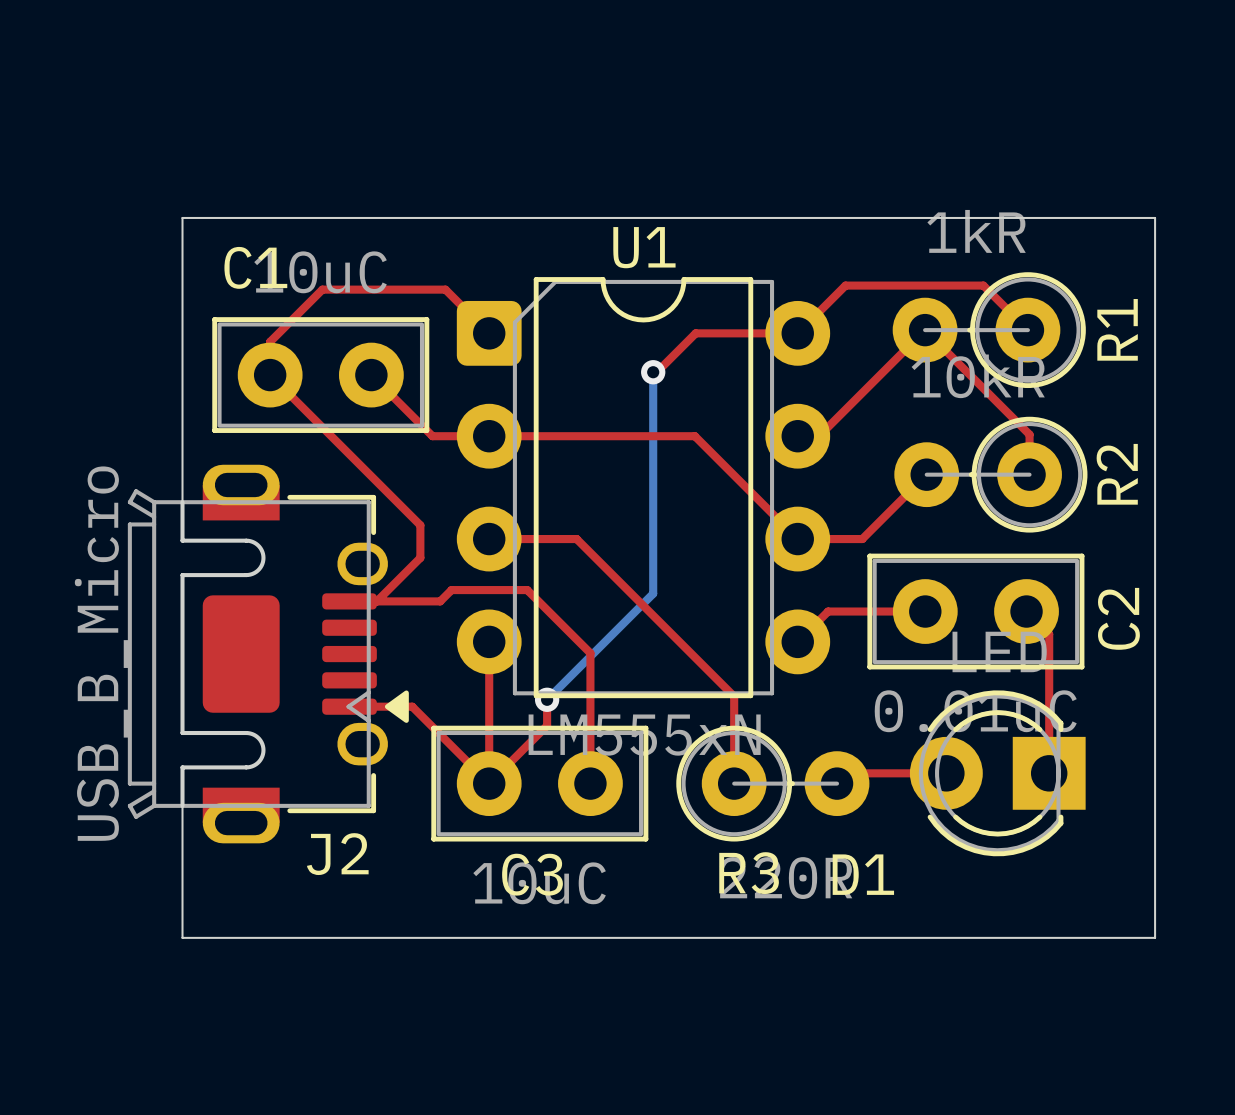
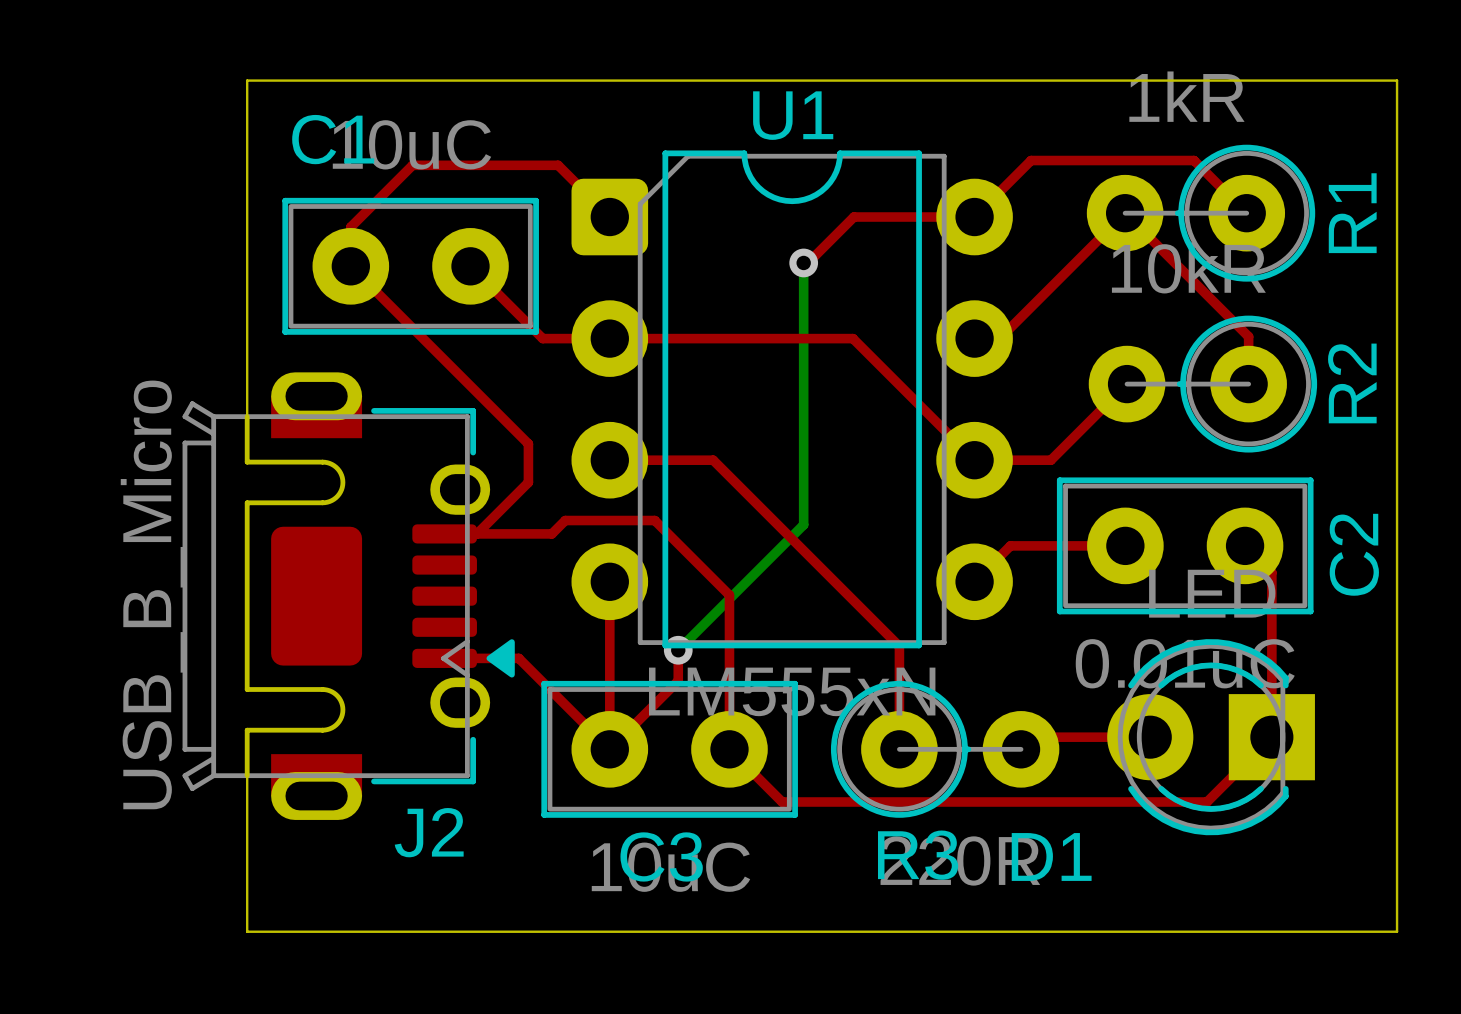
top track: none -> (1271, 737) (1207, 802) (782, 802) (729, 749)

